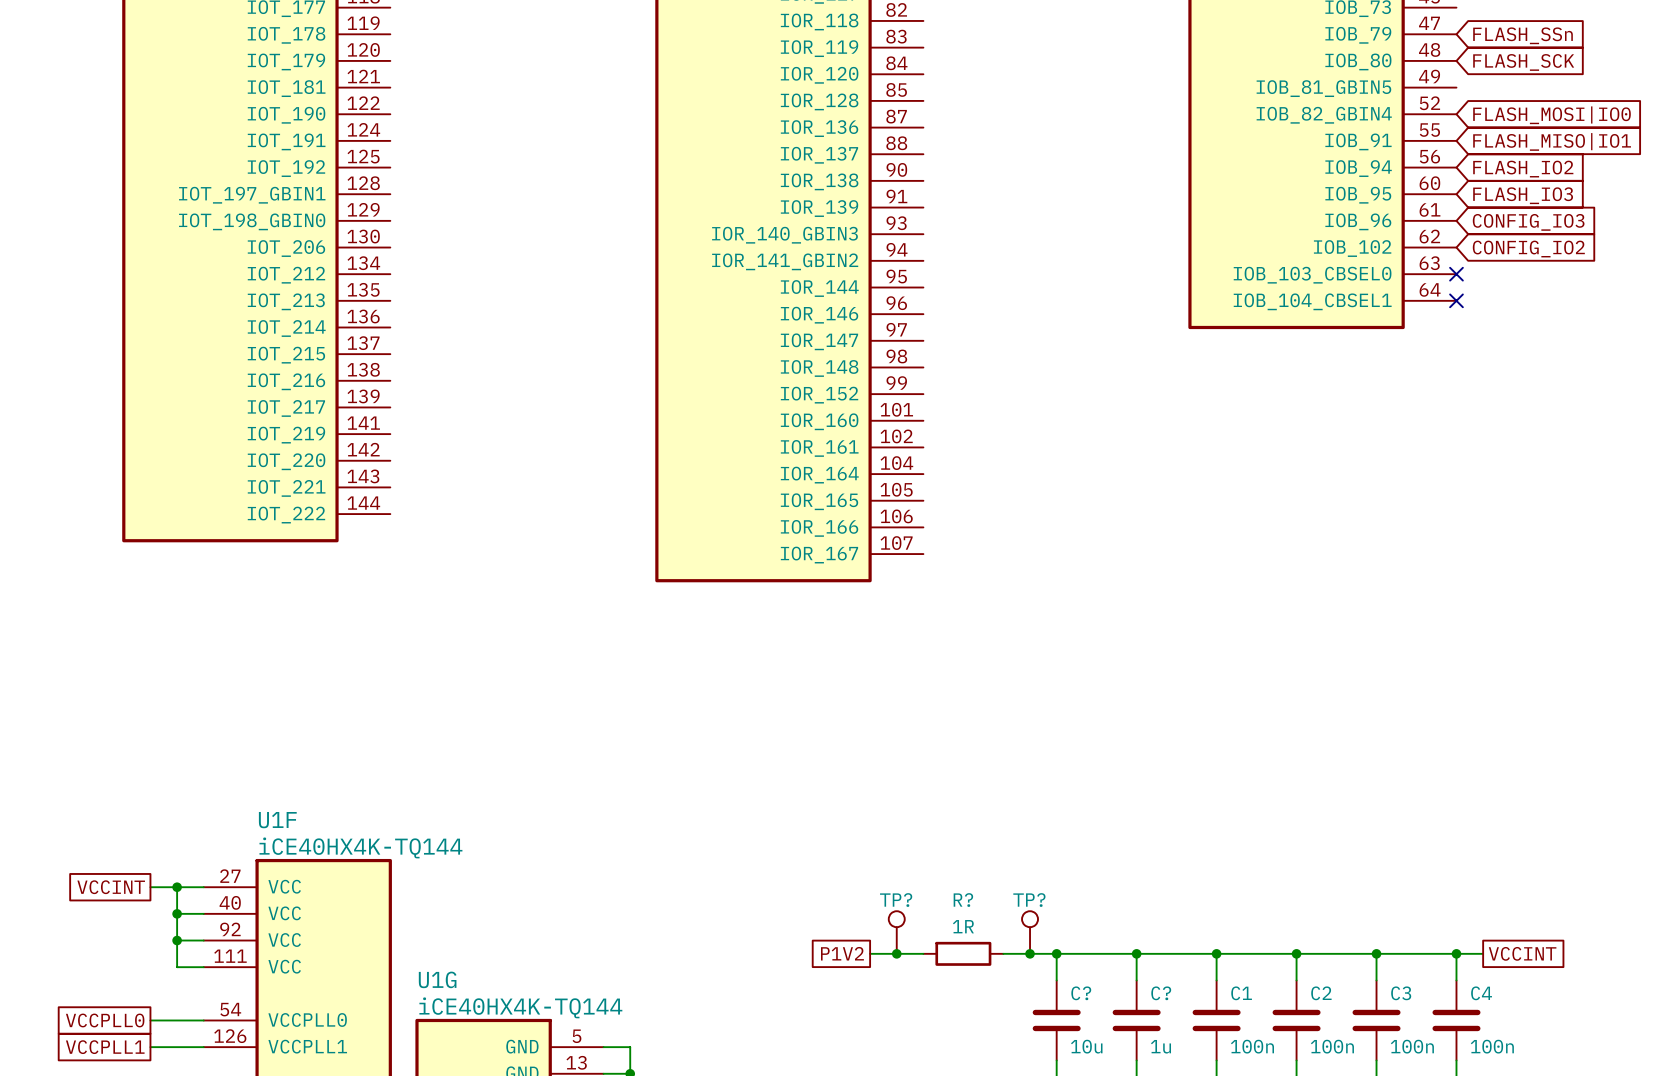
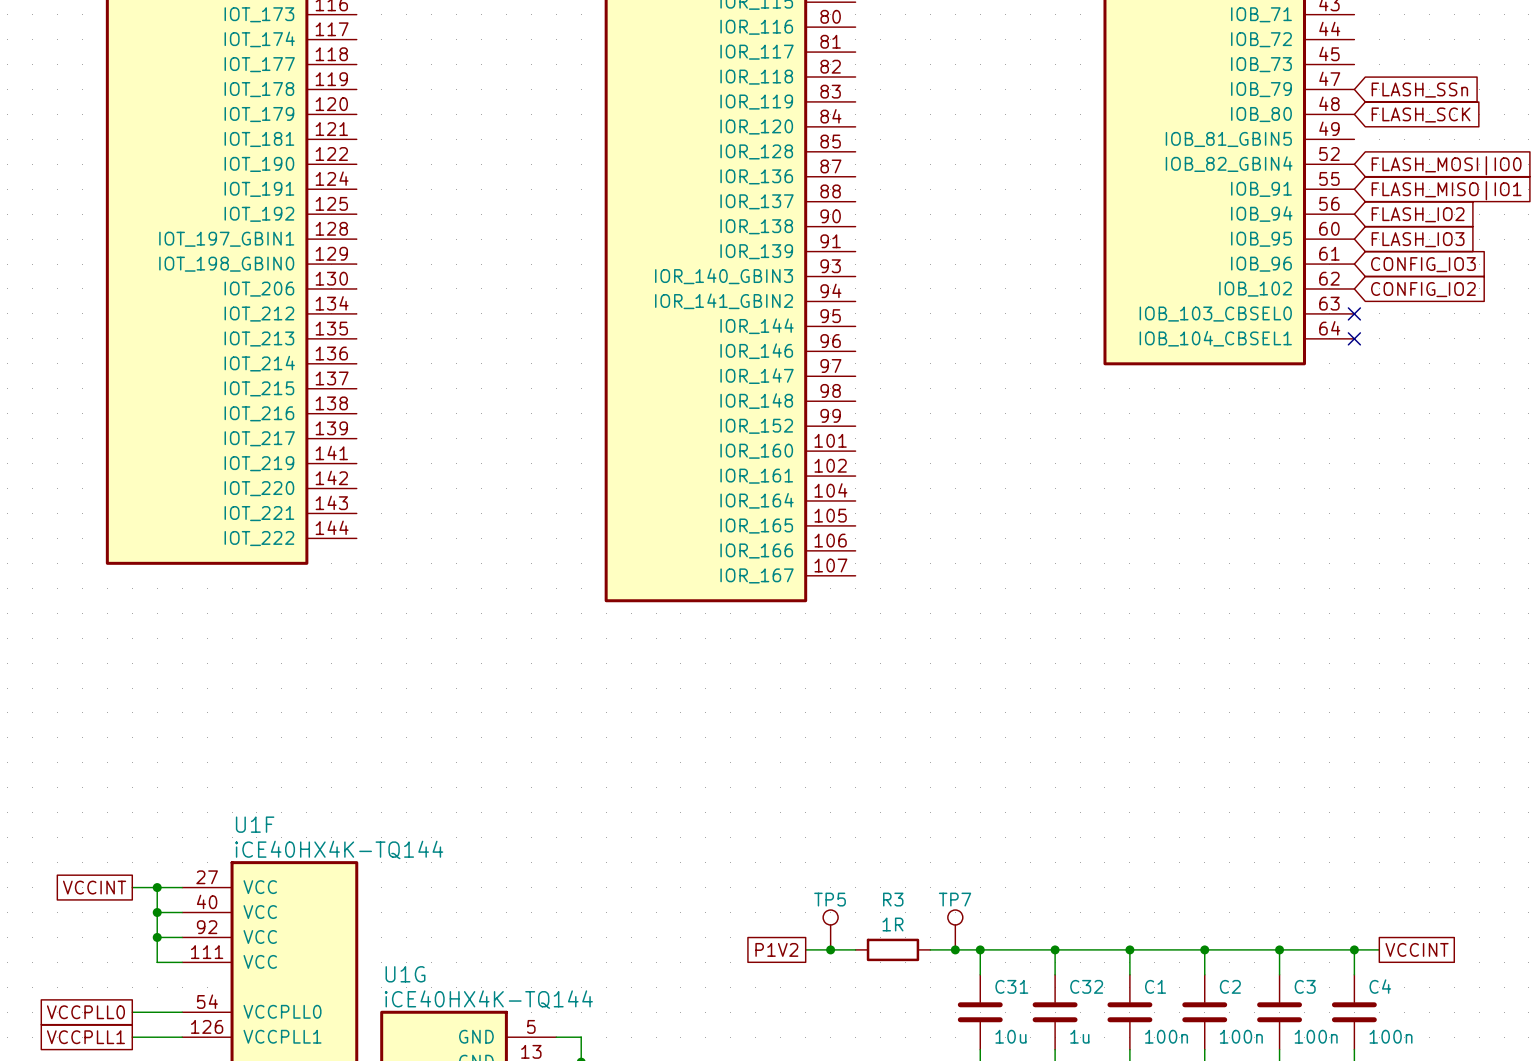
TP? name: TP? (896, 900) -> TP5 (830, 899)
R? name: R? (963, 900) -> R3 (893, 899)
TP? name: TP? (1029, 900) -> TP7 (955, 899)
C? name: C? (1081, 993) -> C31 (1011, 986)
C? name: C? (1161, 993) -> C32 (1086, 986)

